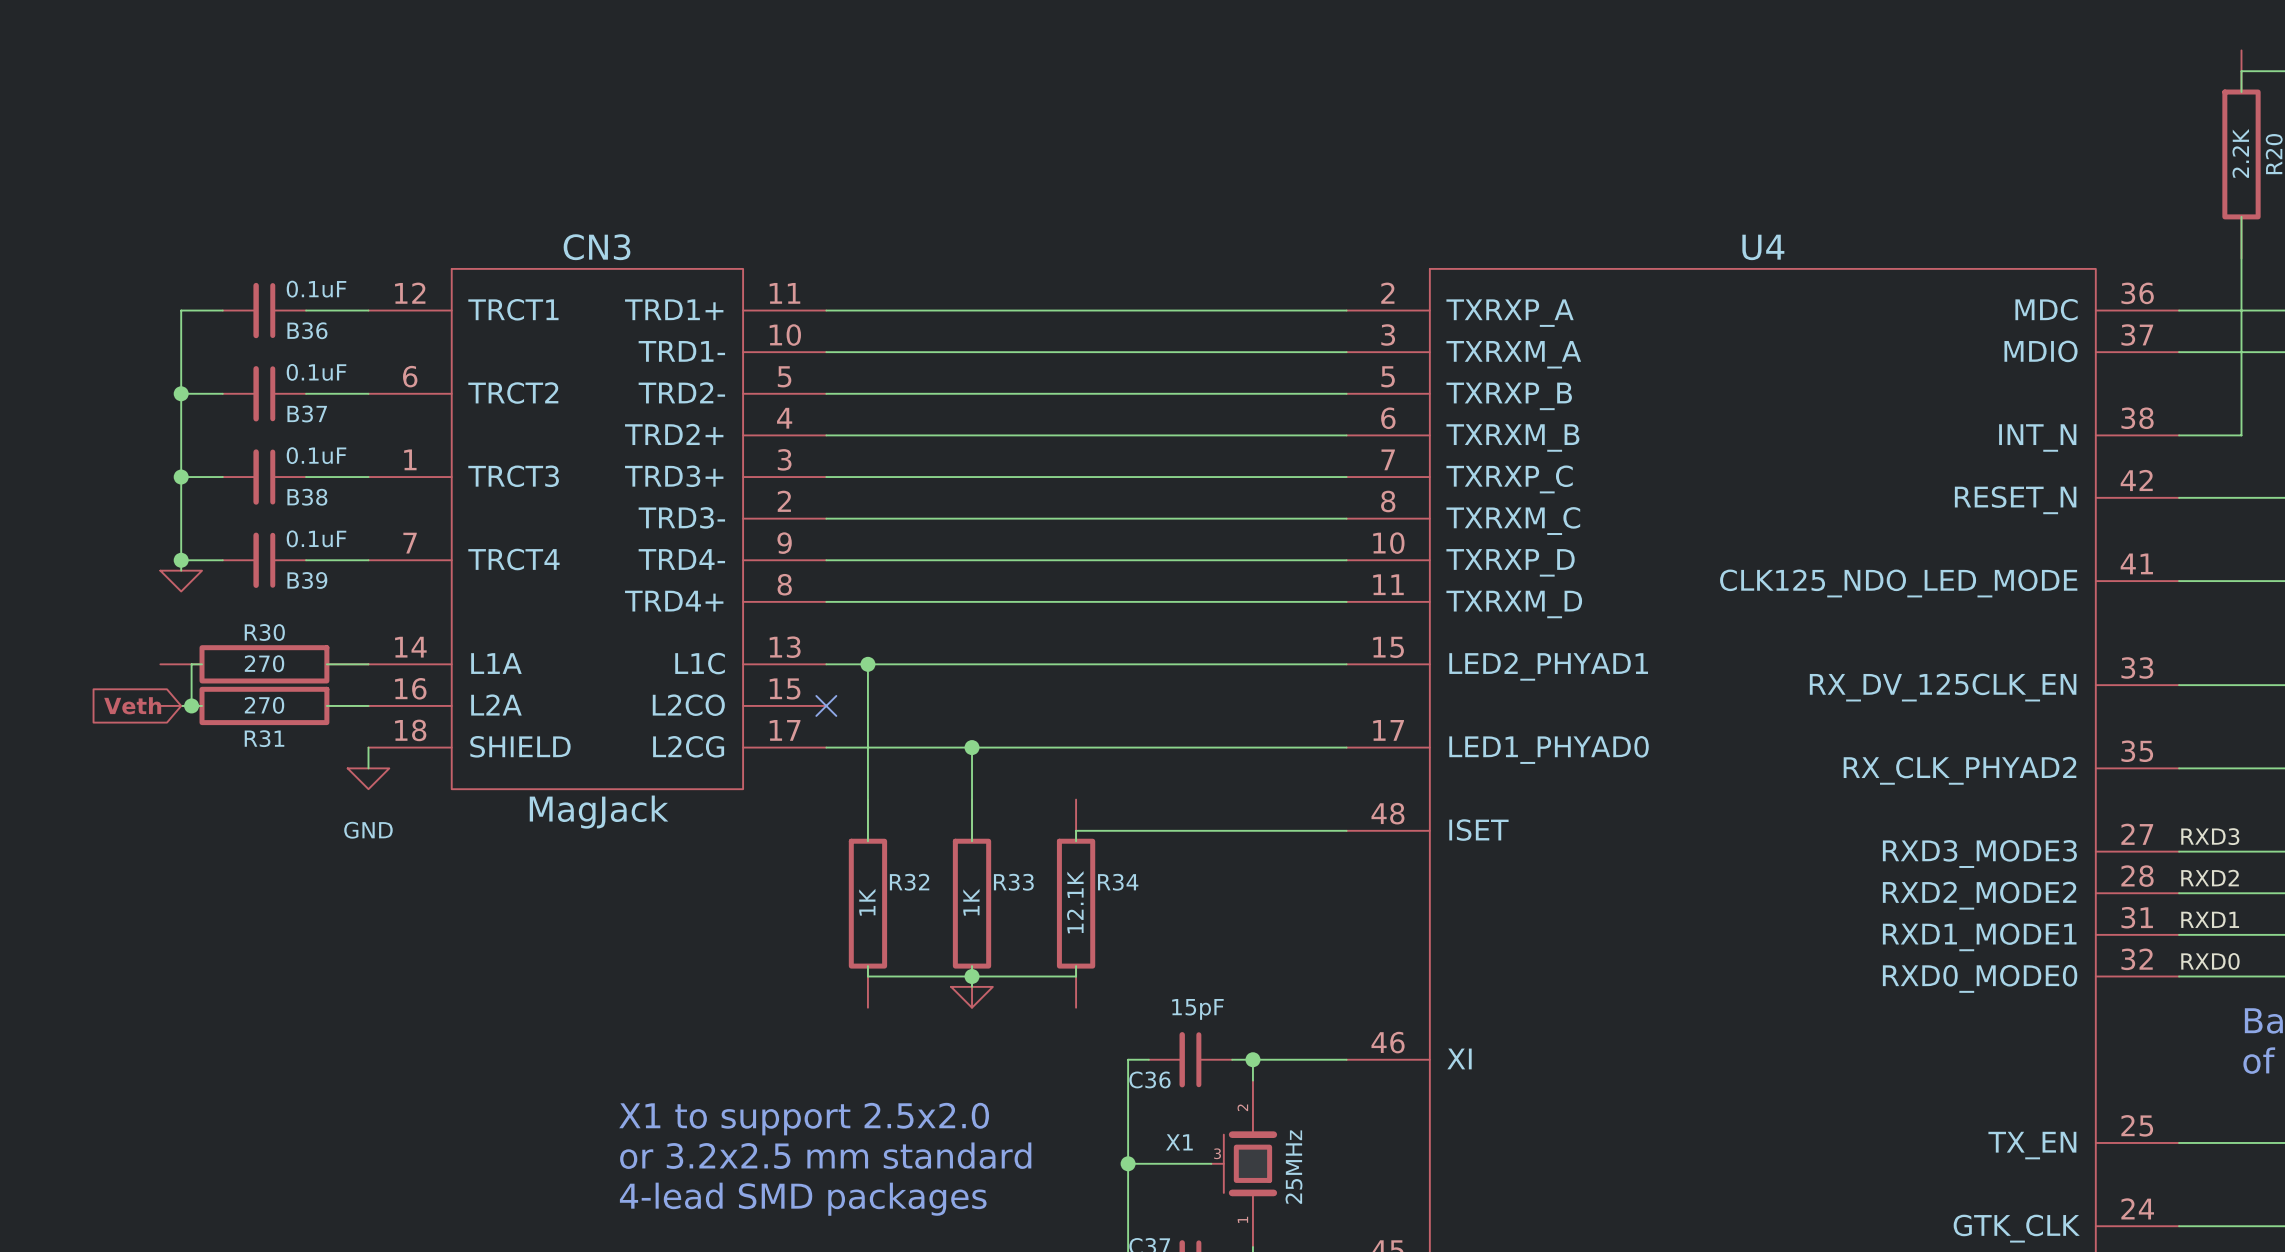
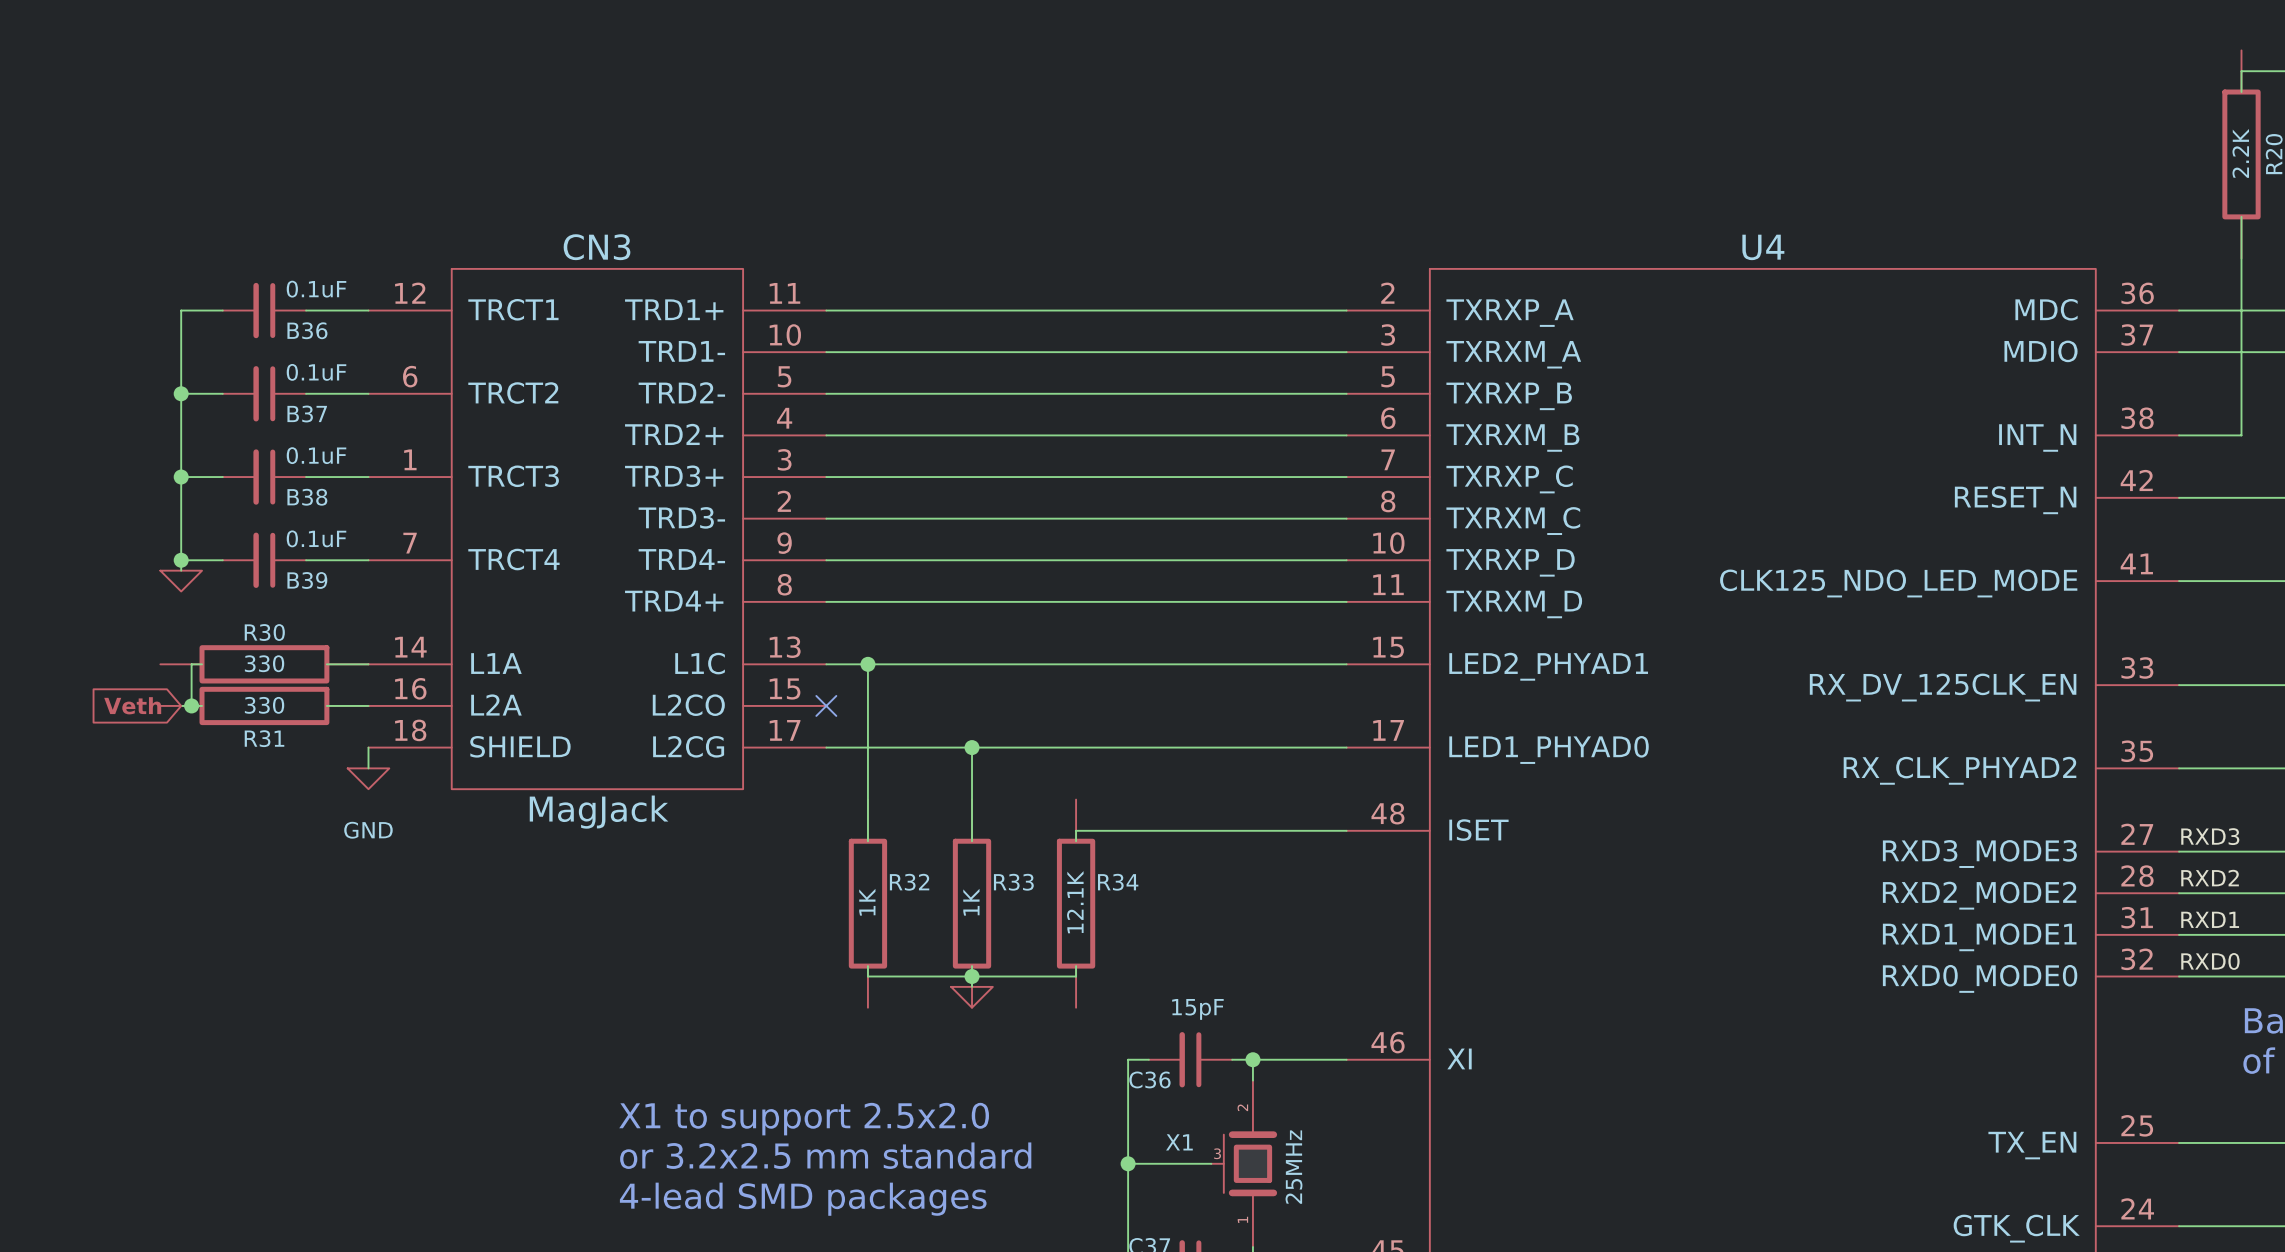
R30 value: 270 (264, 663) -> 330 (264, 663)
R31 value: 270 (264, 705) -> 330 (264, 705)

